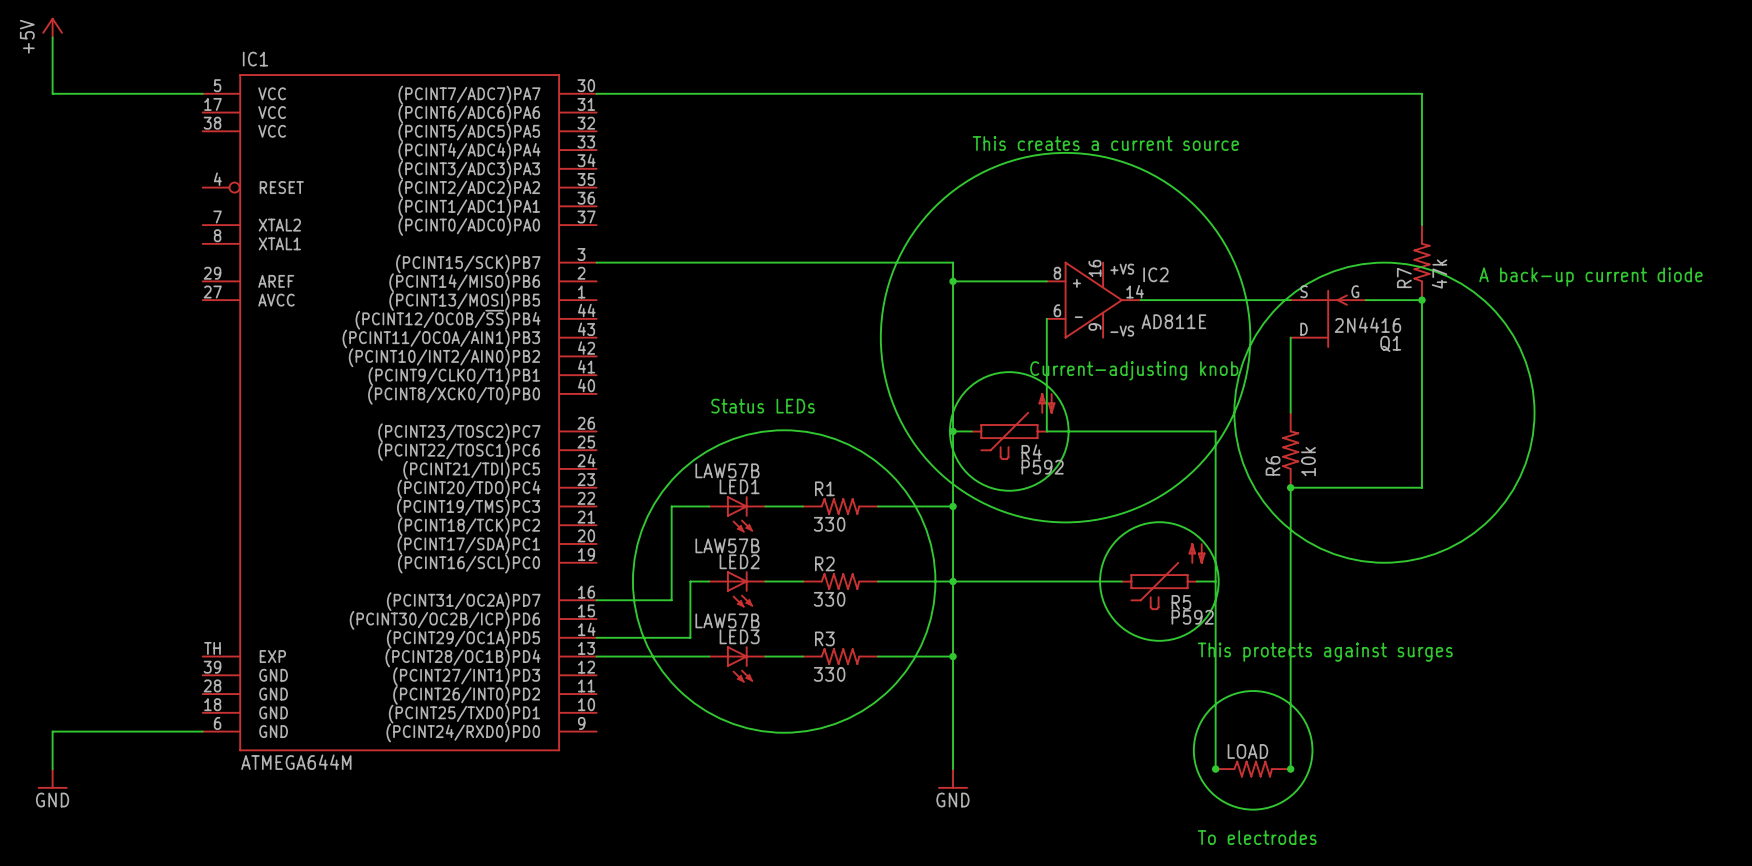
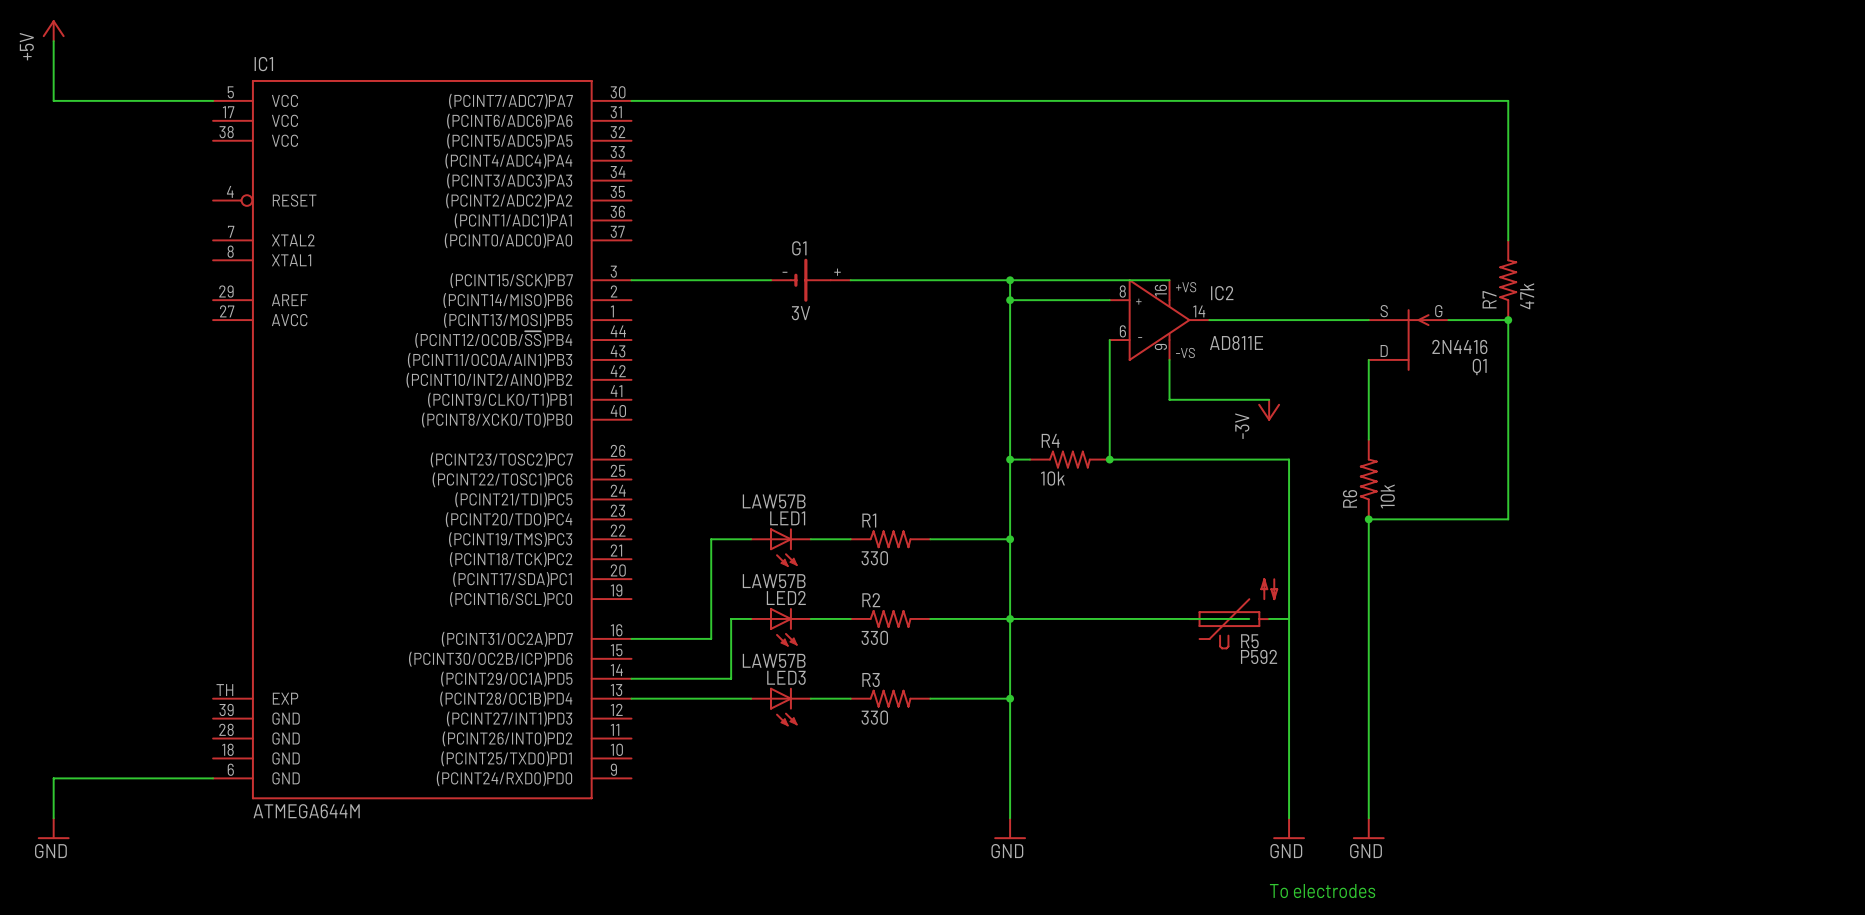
text: This creates a current source (1105, 143) -> none
drawing: [632, 152, 1536, 734] -> none
G1: none -> 3V (810, 280)
wire: none -> (1010, 280) (1169, 280)
junction: none -> (1010, 280)
text: A back-up current diode (1590, 277) -> none
wire: none -> (1169, 359) (1169, 399) (1269, 399)
text: Current-adjusting knob (1134, 370) -> none
power symbol: none -> -3V (1269, 410)
R4 symbol: [971, 393, 1056, 460] -> [1030, 450, 1110, 469]
text: Status LEDs (763, 406) -> none
junction: none -> (1109, 459)
R4 name position: R4 (1031, 452) -> R4 (1050, 440)
R4 value: P592 (1042, 467) -> 10k (1052, 478)
wire: none -> (1189, 618) (1249, 618)
text: This protects against surges (1325, 652) -> none
drawing: [1193, 690, 1314, 811] -> none
junction: (1215, 769) -> none
LOAD: (1253, 769) -> none
junction: (1290, 769) -> none
power symbol: none -> GND (1289, 828)
power symbol: none -> GND (1368, 828)

